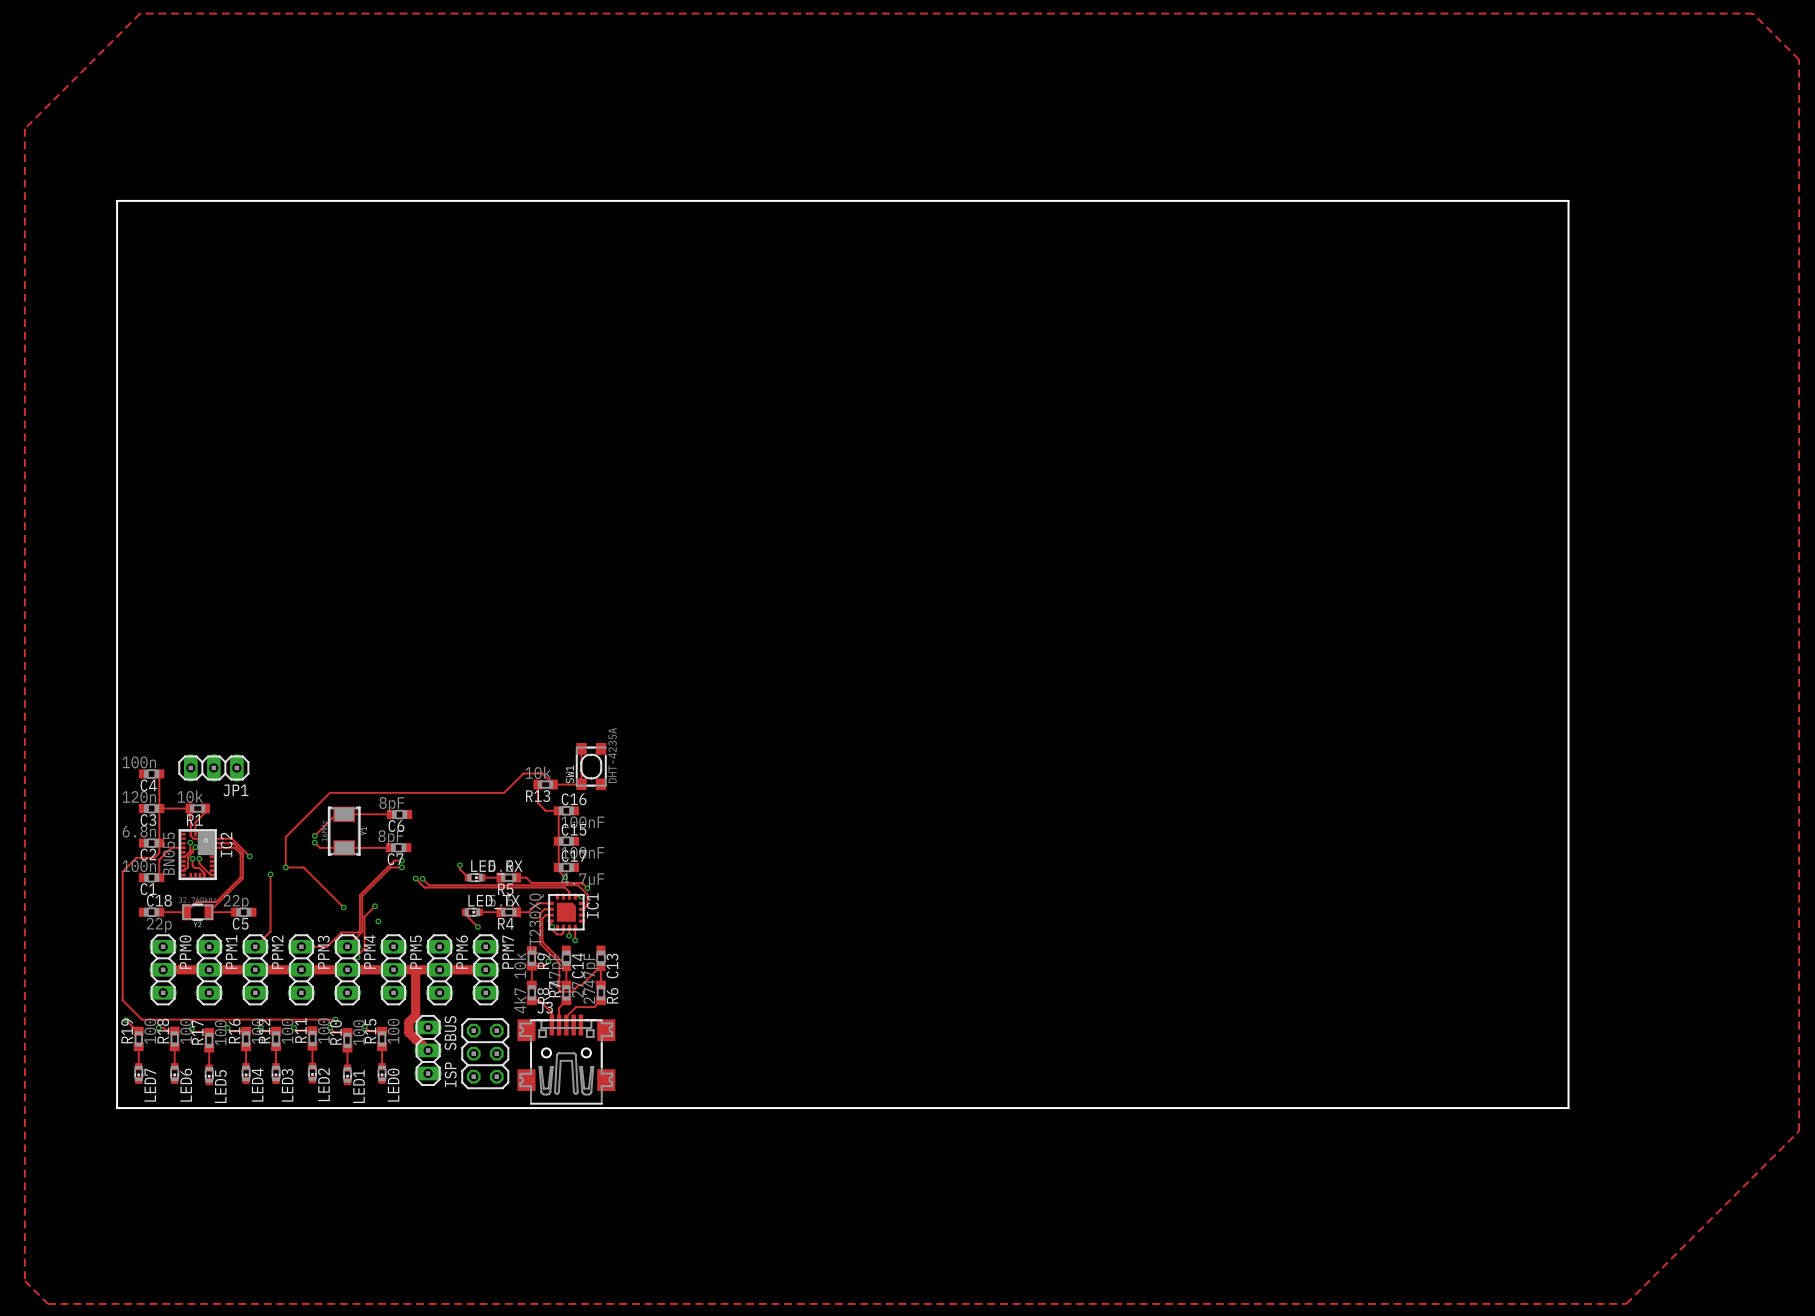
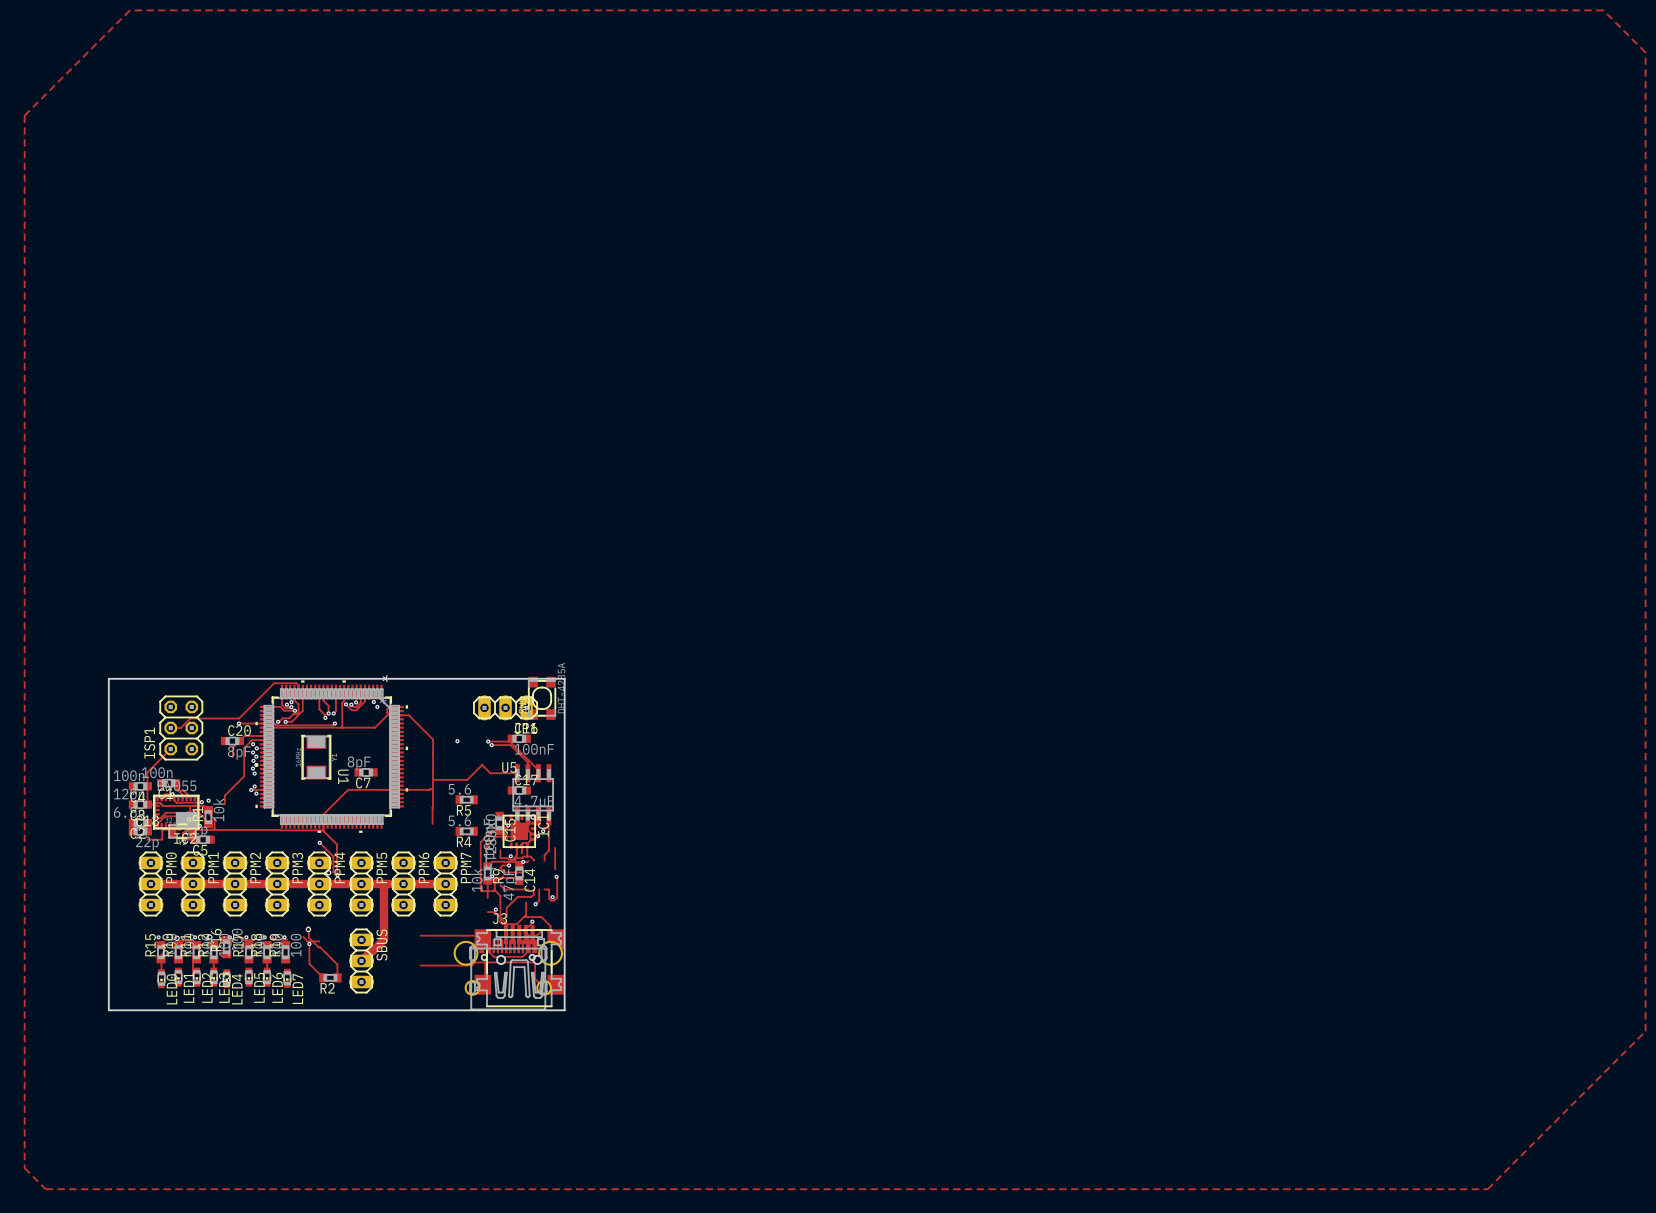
board edge: (117, 745) (117, 200) (1568, 200) (1568, 1108) (616, 1108) -> (108, 678) (564, 678) (564, 1010)
track: (581, 748) (581, 784) (553, 784) (542, 773) (523, 773) (504, 792) (329, 792) (285, 837) (285, 867) (303, 867) (343, 907) -> none
track: none -> (282, 692) (282, 704) (285, 708) (291, 707)
track: none -> (294, 692) (294, 700) (298, 704) (298, 712) (289, 718) (282, 718) (278, 721)
track: none -> (298, 692) (298, 685) (296, 683) (274, 683) (238, 718) (190, 718) (180, 728) (170, 728)
track: none -> (302, 692) (302, 710) (291, 721) (285, 721)
track: none -> (319, 692) (319, 709) (325, 717)
track: none -> (323, 692) (323, 700) (328, 705) (328, 713)
track: none -> (335, 692) (335, 711) (333, 713)
track: none -> (344, 692) (342, 727)
track: none -> (360, 692) (360, 702) (356, 706) (351, 704)
track: none -> (364, 692) (364, 701) (356, 710) (351, 710) (346, 704)
JP1 position: (213, 767) -> (505, 707)
via: none -> (291, 702)
via: none -> (373, 701)
via: none -> (356, 702)
C4 position: (151, 773) -> (140, 786)
track: (159, 773) (159, 847) -> (170, 749) (147, 772)
via: none -> (286, 704)
via: none -> (346, 704)
via: none -> (351, 704)
track: none -> (267, 706) (280, 706) (284, 710) (294, 710)
via: none -> (291, 707)
via: none -> (377, 706)
track: none -> (396, 706) (389, 706) (387, 712) (389, 715) (408, 715) (433, 739) (432, 808)
via: none -> (294, 710)
via: none -> (328, 713)
via: none -> (333, 713)
track: none -> (388, 714) (375, 727) (267, 727)
track: (537, 784) (537, 803) (545, 810) (558, 810) (558, 870) (565, 877) -> none
R13: 10k (545, 784) -> none
via: none -> (325, 717)
via: none -> (278, 721)
via: none -> (285, 721)
track: none -> (238, 723) (274, 723) (276, 725) (333, 725) (334, 723)
via: none -> (238, 723)
via: none -> (334, 723)
ISP1: none -> (181, 728)
track: none -> (267, 735) (244, 735) (232, 747) (232, 757)
C3 position: (151, 808) -> (140, 804)
track: (159, 808) (190, 808) (190, 836) (193, 838) (232, 838) (249, 856) -> none
R1 rotation: 0° (197, 808) -> 90° clockwise (208, 817)
R1 position: (197, 808) -> (208, 817)
track: (205, 808) (205, 812) (195, 822) (195, 834) -> none
track: none -> (267, 740) (252, 740) (244, 748) (244, 776) (224, 795) (224, 804)
C20: none -> 8pF (232, 741)
via: none -> (457, 741)
track: none -> (488, 741) (509, 741) (538, 770) (538, 773)
via: none -> (488, 741)
track: (391, 814) (336, 814) (314, 835) -> none
C6: 8pF (399, 814) -> none
via: none -> (253, 744)
track: none -> (491, 745) (510, 745) (527, 762) (527, 773)
via: none -> (491, 745)
via: none -> (256, 748)
via: none -> (253, 752)
via: none -> (256, 756)
U1: none -> (331, 756)
via: none -> (253, 760)
via: (314, 835) -> none
via: none -> (256, 764)
C15 rotation: 0° (566, 841) -> 90° clockwise (499, 823)
C15 position: (566, 841) -> (499, 823)
track: (190, 842) (190, 851) (183, 856) -> none
via: (190, 842) -> none
track: (314, 842) (320, 847) (390, 847) -> none
via: (314, 842) -> none
C2 position: (151, 843) -> (140, 822)
track: (211, 843) (233, 843) (242, 852) (242, 878) (209, 912) (236, 912) -> none
via: none -> (252, 768)
track: (183, 847) (171, 847) (159, 859) -> (147, 777) (147, 783)
track: (195, 847) (188, 856) (188, 867) (183, 870) -> none
via: (195, 847) -> none
track: (211, 847) (234, 847) (240, 853) (240, 877) (215, 902) (196, 902) (186, 912) (159, 912) -> none
via: none -> (254, 773)
track: none -> (517, 773) (490, 773) (482, 764) (467, 779) (432, 779)
track: (159, 852) (154, 857) (136, 857) (122, 871) (122, 1000) (141, 1019) (335, 1019) -> none
IC2 rotation: 0° (197, 854) -> 90° clockwise (176, 812)
IC2 position: (197, 854) -> (176, 812)
via: (249, 856) -> none
via: (192, 858) -> none
track: (199, 858) (199, 863) (211, 875) -> none
via: (199, 858) -> none
track: (401, 860) (394, 860) (359, 895) (358, 932) (341, 932) (327, 946) (301, 946) -> none
via: (401, 860) -> none
via: none -> (254, 786)
track: none -> (175, 788) (182, 794) (182, 799)
track: (459, 865) (459, 869) (468, 877) -> none
via: (459, 865) -> none
track: none -> (267, 789) (251, 790)
track: none -> (432, 789) (348, 789) (323, 814) (323, 830)
via: none -> (251, 790)
via: (285, 867) -> none
track: (401, 867) (390, 867) (362, 895) (362, 932) (347, 946) -> none
via: (401, 867) -> none
via: none -> (256, 793)
track: none -> (172, 794) (165, 794) (161, 799)
via: none -> (172, 794)
U5: none -> (533, 794)
track: (270, 874) (270, 931) (255, 946) -> none
via: (270, 874) -> none
C1 position: (151, 877) -> (168, 783)
track: none -> (174, 799) (176, 802) (201, 802)
LED_RX: (475, 877) -> none
track: (481, 877) (501, 877) -> none
track: (516, 877) (526, 877) (531, 882) (582, 882) (587, 888) -> none
via: (565, 877) -> none
via: none -> (208, 800)
track: (415, 878) (424, 887) (565, 887) (569, 891) (569, 896) -> none
via: (415, 878) -> none
track: (422, 878) (429, 885) (578, 885) (587, 894) (587, 904) (582, 909) -> none
via: (422, 878) -> none
via: none -> (201, 802)
track: none -> (147, 804) (160, 803) (163, 805) (204, 805) (214, 819) (213, 829)
track: none -> (190, 805) (190, 810) (194, 814)
track: none -> (432, 806) (432, 824)
track: none -> (194, 810) (208, 824)
via: (587, 888) -> none
track: none -> (187, 813) (165, 812) (157, 818)
track: none -> (181, 816) (165, 816) (157, 825)
track: none -> (527, 816) (530, 840) (523, 842) (516, 849) (516, 855) (512, 859)
track: none -> (548, 816) (548, 850) (544, 855) (544, 860)
track: (537, 903) (550, 903) -> none
track: (537, 903) (528, 912) (516, 912) -> none
track: none -> (182, 825) (180, 829) (163, 829) (162, 839) (147, 839)
track: none -> (186, 825) (186, 829) (182, 832) (182, 839) (196, 839)
track: none -> (190, 825) (194, 829) (322, 830) (336, 844) (337, 875)
track: none -> (508, 825) (503, 830) (492, 830) (480, 842) (480, 890) (493, 891) (494, 889)
via: none -> (508, 825)
track: none -> (548, 825) (543, 831)
via: none -> (199, 825)
track: (375, 906) (364, 916) (364, 948) (357, 957) -> none
via: (375, 906) -> none
via: (343, 907) -> none
track: (550, 909) (544, 909) (540, 913) (540, 943) (559, 962) (559, 990) (572, 991) (600, 966) (600, 985) -> none
C5 position: (243, 912) -> (203, 839)
track: (465, 912) (465, 914) (477, 926) -> none
LED_TX: (472, 912) -> none
track: (479, 912) (501, 912) -> none
via: none -> (543, 831)
track: (550, 915) (545, 915) (542, 918) (542, 941) (566, 966) (566, 985) -> none
via: none -> (538, 836)
track: none -> (525, 836) (496, 836) (486, 846) (486, 867) (492, 861) (528, 860)
via: (378, 921) -> none
track: (550, 921) (552, 929) (557, 934) (563, 932) (563, 927) -> none
track: none -> (319, 842) (333, 856) (333, 872)
via: none -> (319, 842)
via: (477, 926) -> none
via: (552, 926) -> none
track: none -> (555, 847) (555, 869)
track: none -> (500, 850) (501, 858) (514, 859) (530, 856) (533, 860)
via: (569, 935) -> none
via: none -> (510, 856)
via: (575, 940) -> none
via: none -> (523, 861)
track: none -> (509, 865) (502, 865) (500, 867) (505, 872) (522, 872)
via: none -> (509, 865)
C13: 47pF (600, 958) -> none
via: none -> (337, 875)
via: none -> (492, 876)
via: (548, 961) -> none
track: none -> (556, 876) (557, 897) (551, 900) (549, 898) (549, 889) (544, 889)
via: none -> (556, 876)
track: none -> (522, 877) (496, 877) (494, 879) (494, 890)
track: (415, 969) (415, 1015) (408, 1022) (408, 1032) (428, 1050) -> none
track: none -> (383, 883) (383, 939) (361, 960)
track: none -> (500, 885) (504, 889) (528, 889)
track: none -> (533, 889) (533, 894) (531, 896) (517, 896) (506, 907) (506, 917)
track: none -> (539, 889) (539, 900) (535, 904)
track: none -> (494, 890) (500, 895) (500, 922) (502, 924) (517, 924) (526, 914) (526, 902)
via: none -> (552, 897)
via: none -> (535, 904)
R8: 4k7 (531, 992) -> none
R7: 27 (566, 992) -> none
R6: 27 (600, 992) -> none
via: none -> (495, 909)
track: (566, 1000) (559, 1007) (559, 1025) -> none
track: (600, 1000) (594, 1007) (576, 1007) (566, 1016) (566, 1025) -> none
track: none -> (524, 917) (541, 917) (550, 926) (550, 953) (543, 953) (534, 962) (475, 962) (472, 965) (420, 965)
track: none -> (532, 921) (524, 931) (528, 935) (528, 951) (522, 956) (494, 956) (488, 951) (488, 941) (482, 935) (420, 935)
via: none -> (532, 921)
track: none -> (308, 926) (308, 937) (337, 964) (337, 977)
track: (126, 1020) (138, 1031) -> none
via: (126, 1020) -> none
track: none -> (541, 931) (536, 935) (528, 935)
track: (364, 1026) (369, 1031) (382, 1031) -> none
via: (364, 1026) -> none
track: (158, 1027) (163, 1027) (166, 1031) (174, 1031) -> none
via: (158, 1027) -> none
track: (227, 1027) (231, 1031) (246, 1031) -> none
via: (260, 1027) -> none
via: (294, 1027) -> none
via: (329, 1027) -> none
via: none -> (158, 937)
via: none -> (195, 937)
track: none -> (229, 937) (231, 945)
via: none -> (229, 937)
via: none -> (246, 937)
via: none -> (264, 937)
via: none -> (284, 937)
track: none -> (309, 943) (309, 963) (323, 977)
via: none -> (309, 943)
R19 position: (138, 1038) -> (285, 952)
R18 position: (174, 1038) -> (267, 952)
R12 position: (276, 1038) -> (213, 952)
R11 position: (312, 1038) -> (196, 952)
R15 position: (382, 1038) -> (160, 952)
R17 position: (209, 1040) -> (248, 952)
R10 position: (347, 1040) -> (178, 952)
track: (138, 1046) (138, 1066) -> none
track: (246, 1046) (246, 1066) -> none
track: (276, 1046) (276, 1066) -> none
track: (312, 1046) (312, 1066) -> none
track: (382, 1046) (382, 1066) -> none
track: (347, 1048) (347, 1068) -> none
SBUS position: (428, 1050) -> (361, 960)
track: none -> (213, 959) (213, 970)
track: none -> (267, 959) (267, 970)
ISP: (485, 1053) -> none
track: none -> (535, 961) (535, 978) (544, 987)
track: none -> (485, 962) (485, 975) (472, 987)
part: none -> (508, 974)
LED2: none -> (196, 977)
LED6: none -> (267, 977)
R2: none -> (330, 977)
LED7: (138, 1073) -> none
LED3 position: (276, 1073) -> (213, 977)
LED0: (382, 1073) -> none
LED5 position: (209, 1074) -> (248, 977)
LED1 position: (347, 1074) -> (178, 977)
LED2 name: LED2 (323, 1084) -> LED7 (297, 988)
LED6 name: LED6 (186, 1085) -> LED0 (171, 989)

